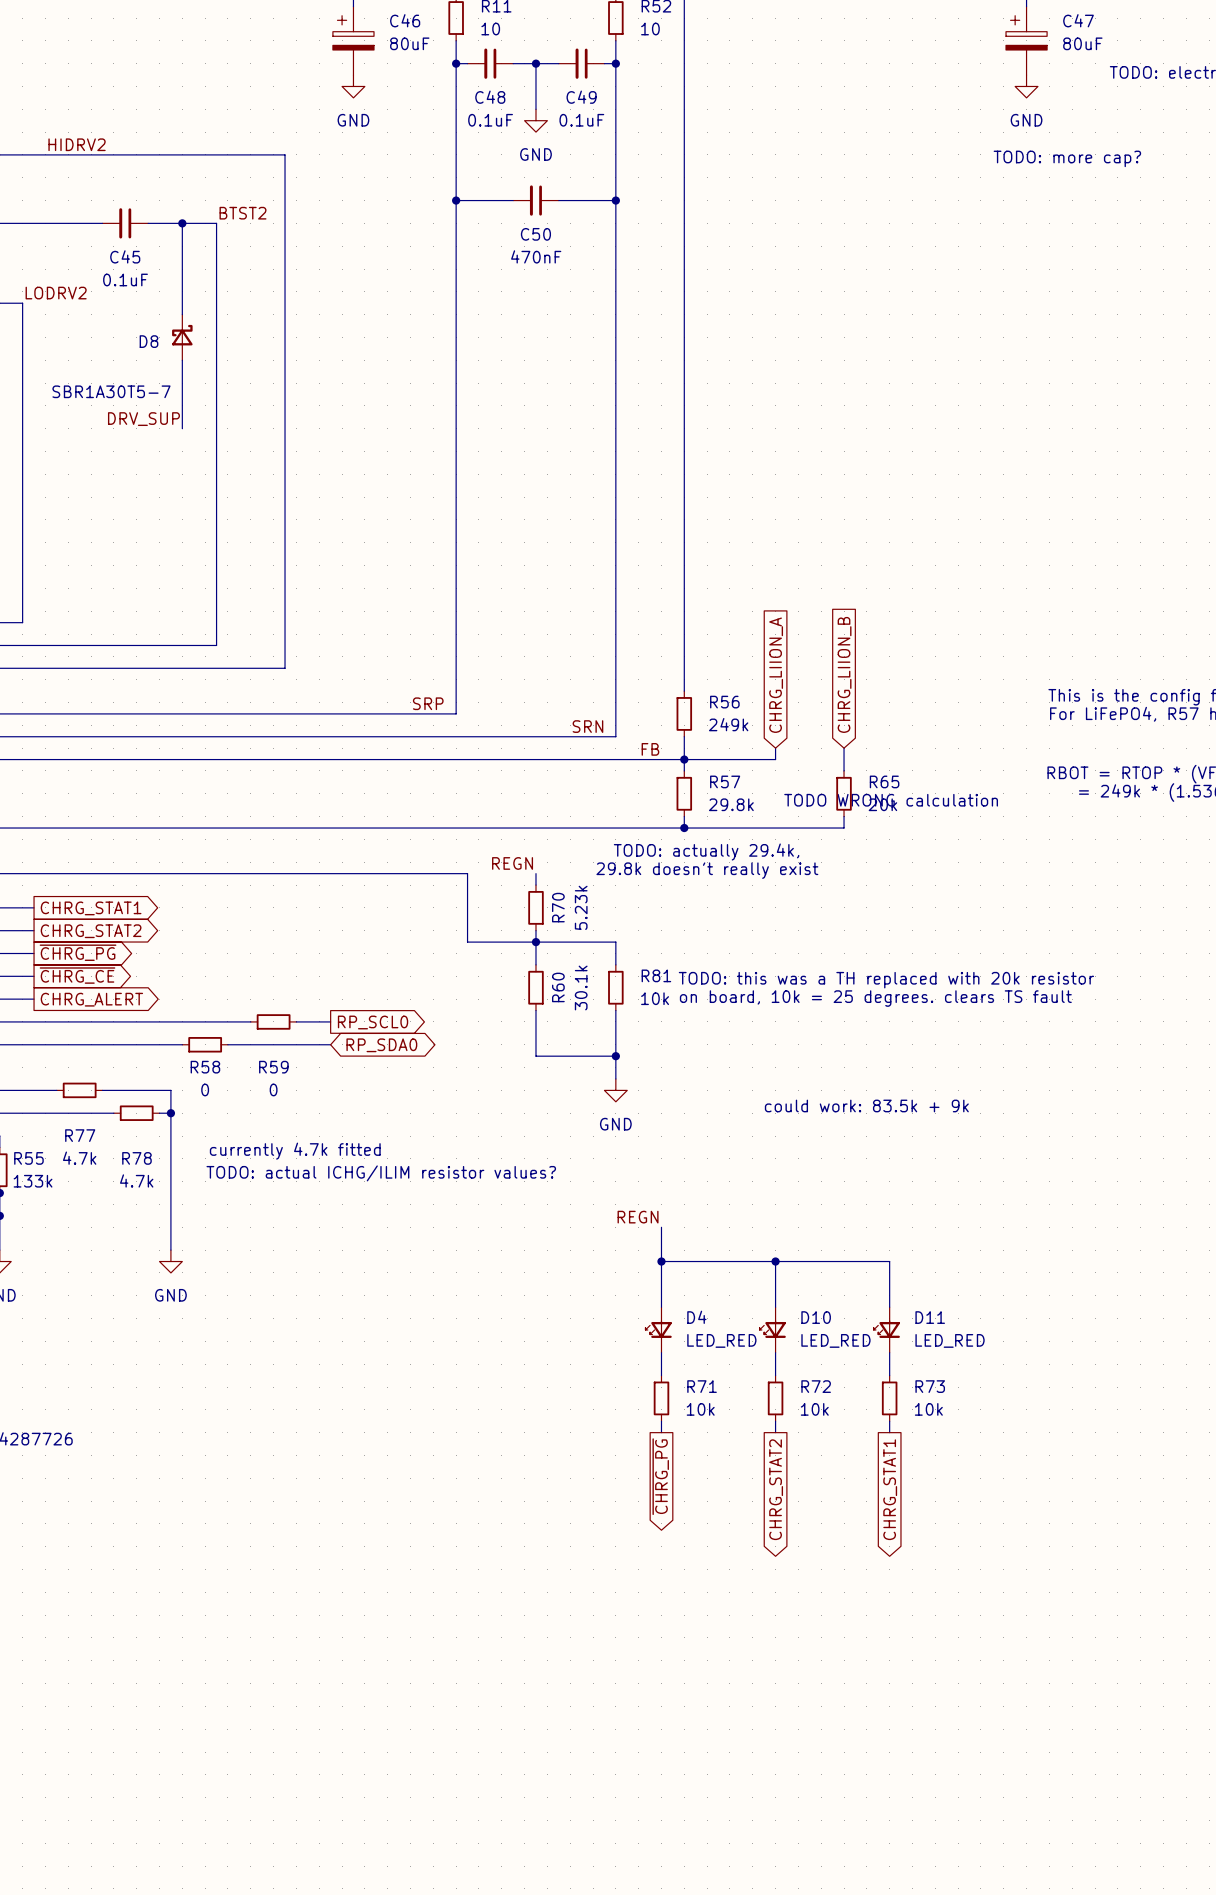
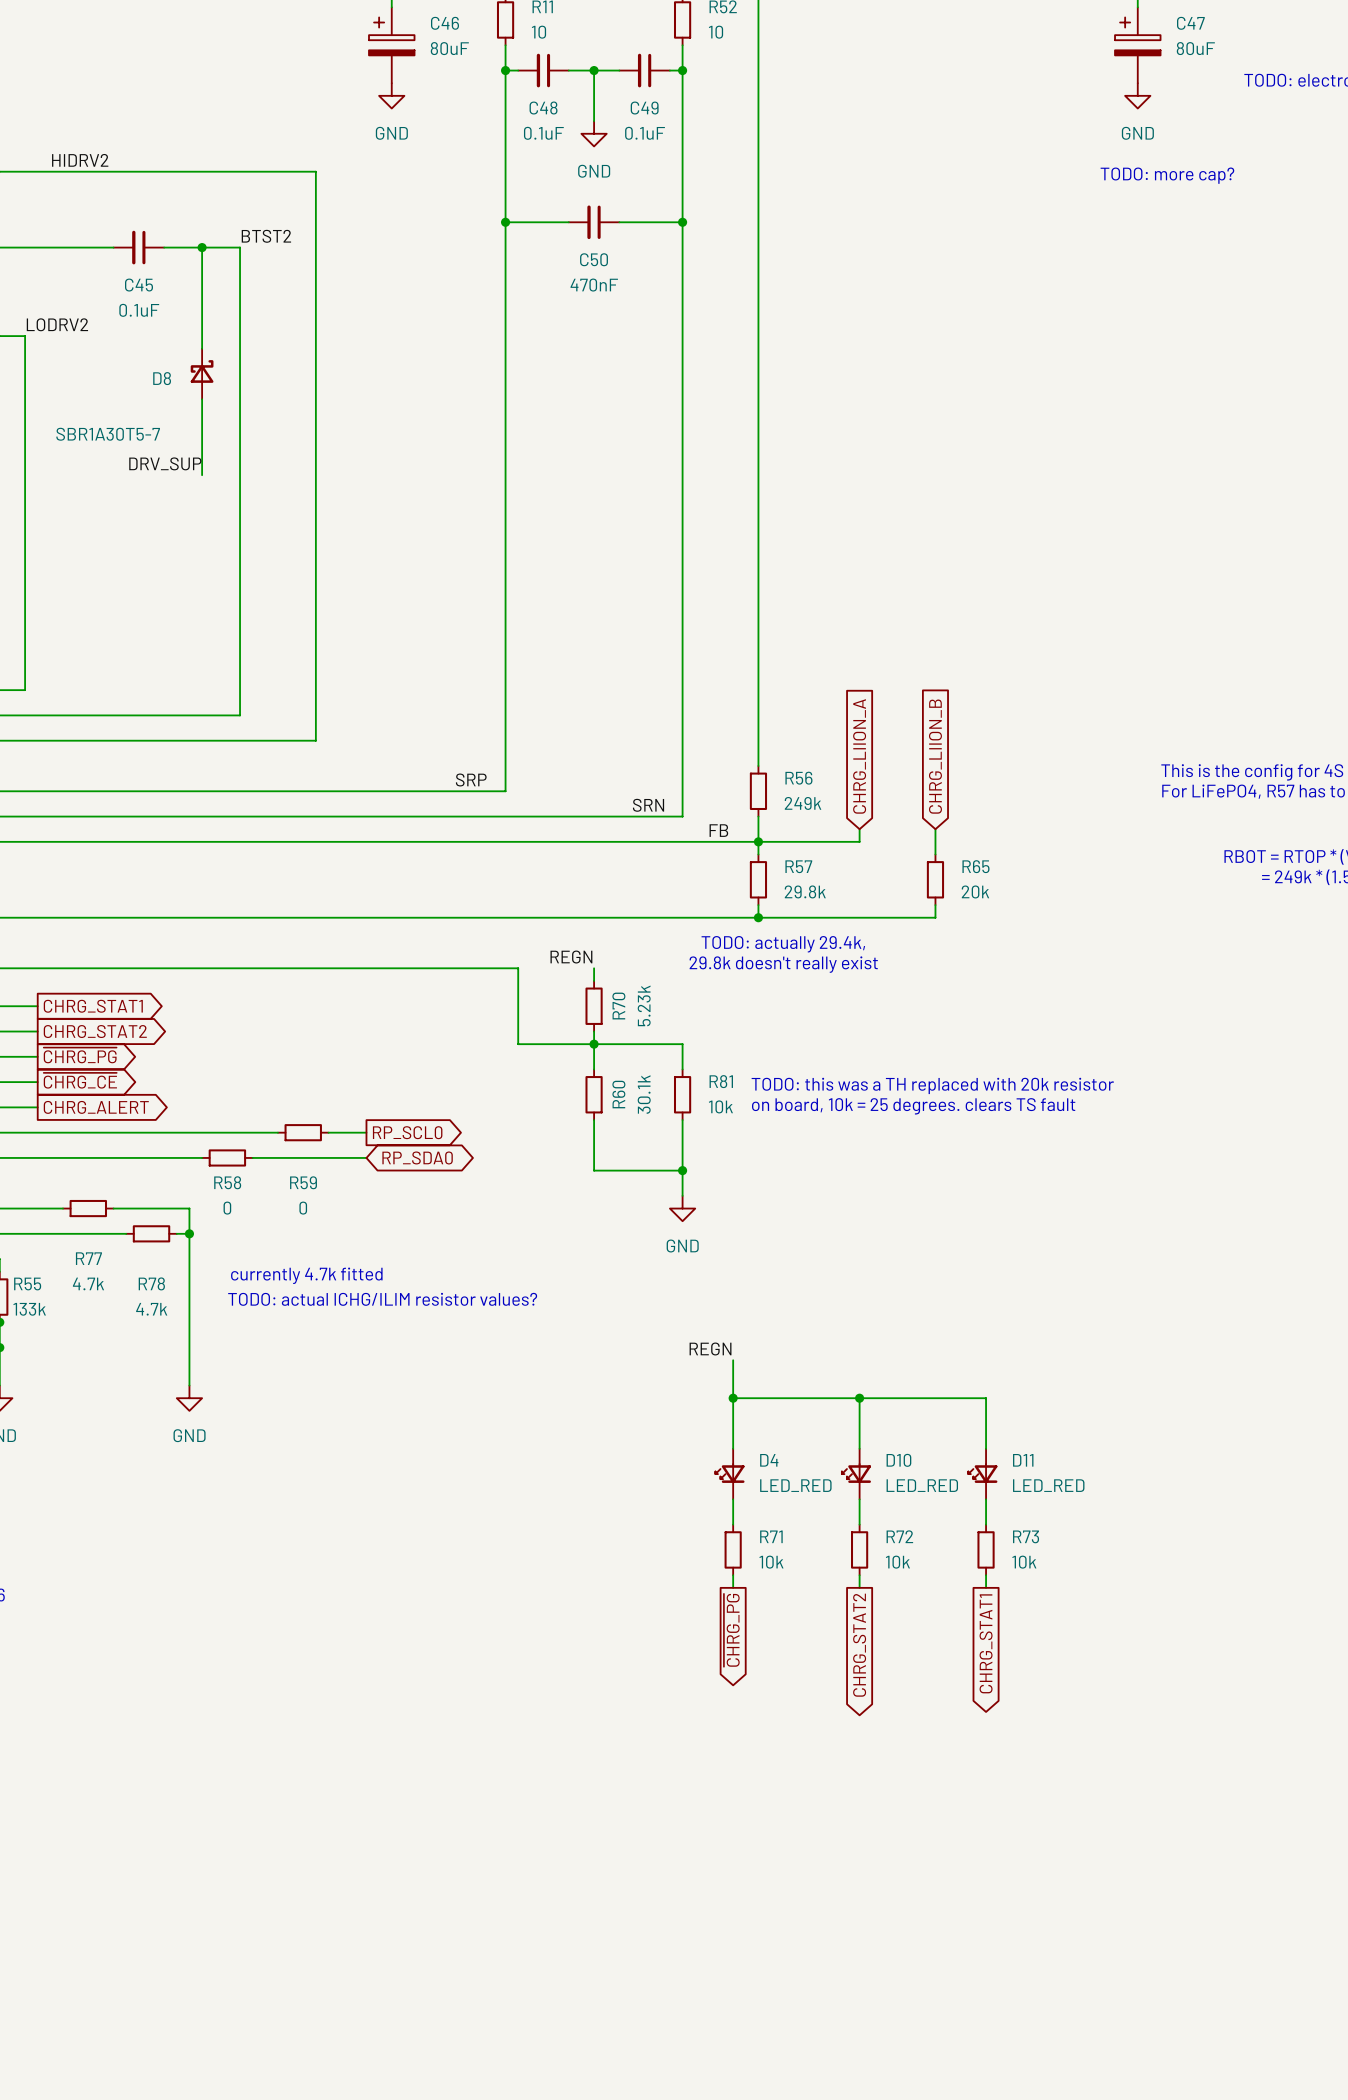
text: TODO WRONG calculation (891, 800) -> none
text: could work: 83.5k + 9k (866, 1105) -> none

